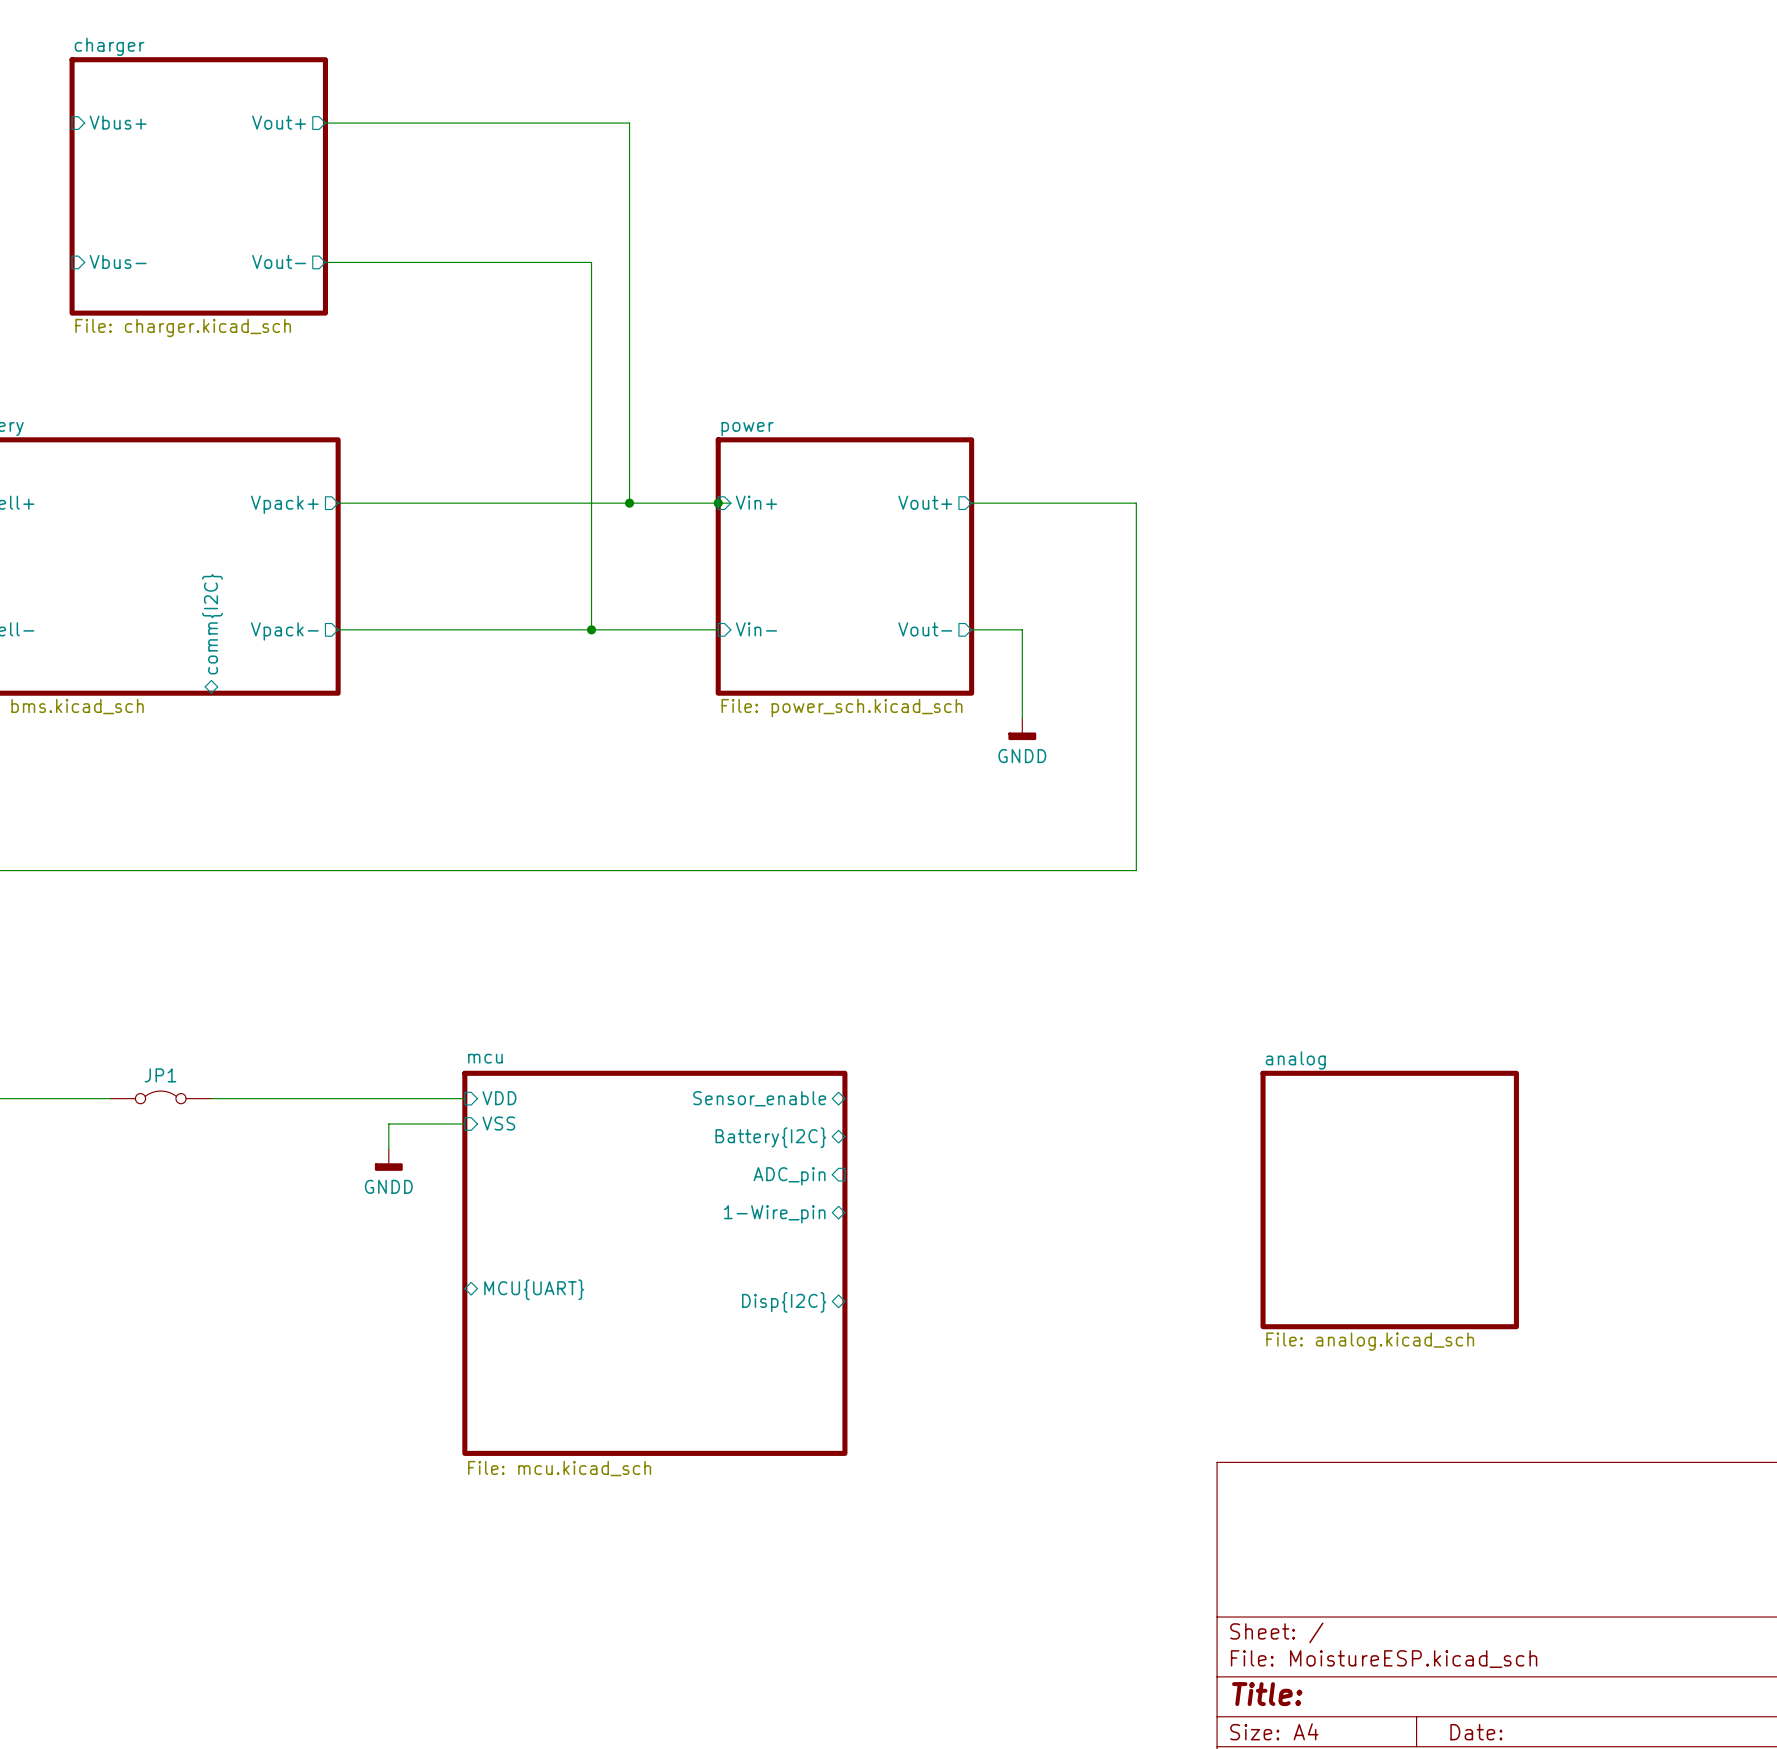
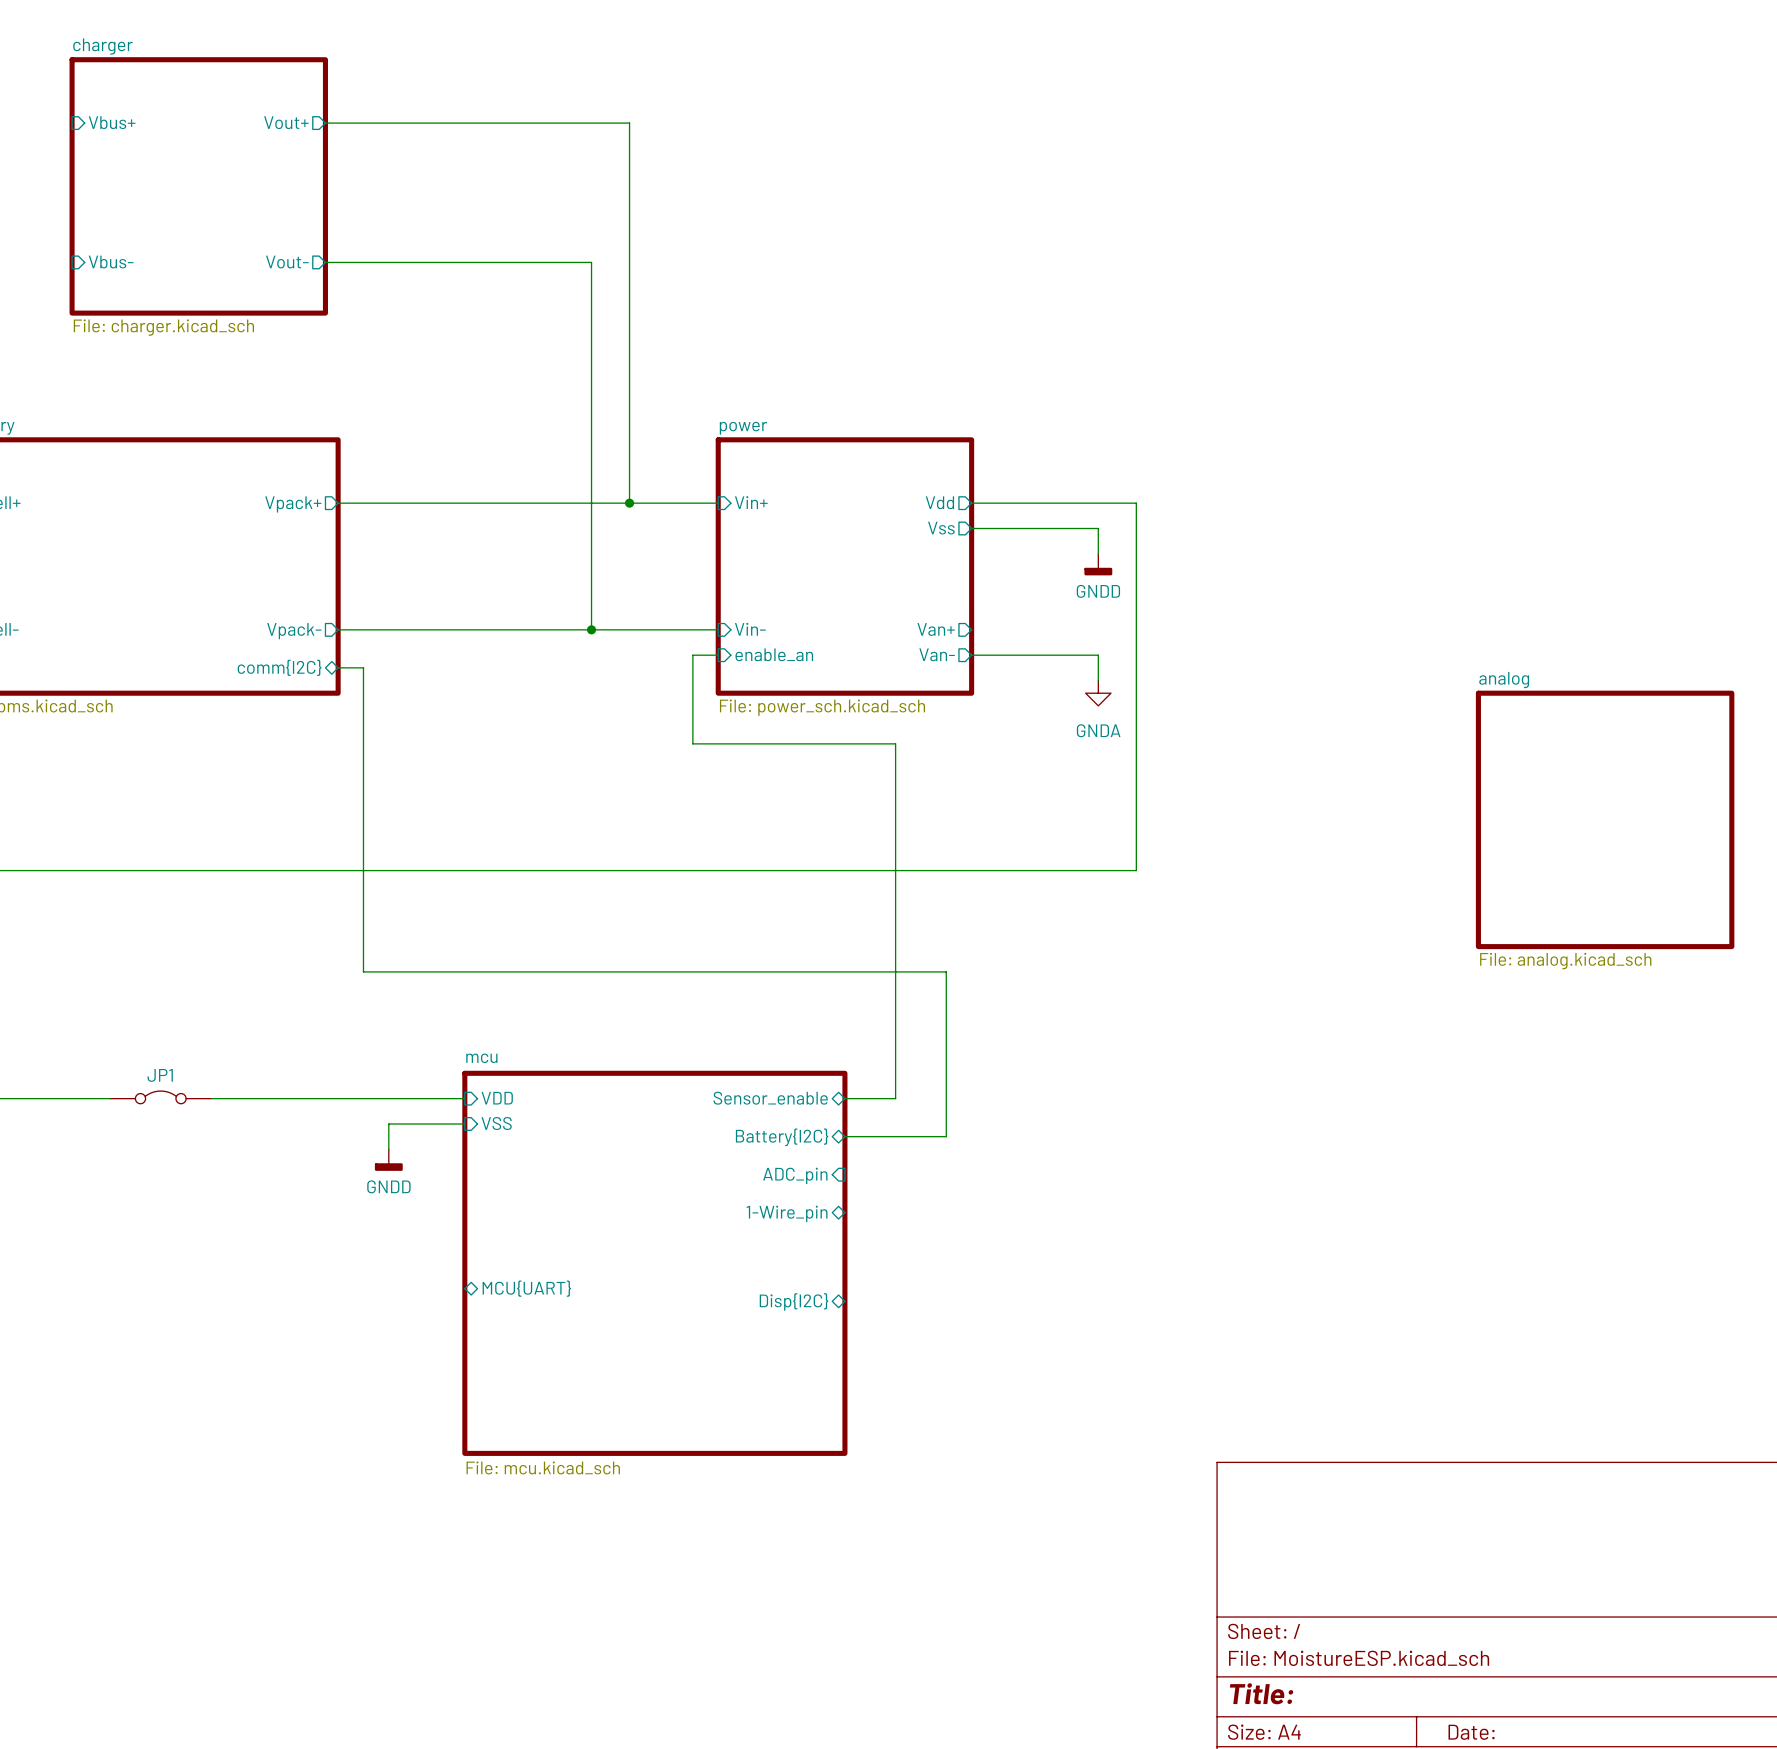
sheet pin: Vout+ (925, 502) -> Vdd (939, 502)
wire: (718, 503) (730, 503) -> none
junction: (718, 503) -> none
sheet pin: none -> Vss (941, 528)
wire: none -> (971, 528) (1098, 528) (1098, 553)
sheet pin rotation: 0° (212, 624) -> 90° counterclockwise (279, 667)
sheet pin: Vout- (925, 629) -> Van+ (936, 629)
wire: (971, 629) (1022, 629) (1022, 718) -> none
sheet pin: none -> Van- (937, 654)
wire: none -> (718, 655) (692, 655) (692, 743) (895, 743) (895, 1098) (844, 1098)
sheet pin: none -> enable_an (774, 654)
wire: none -> (971, 655) (1098, 655) (1098, 680)
wire: none -> (338, 667) (363, 667) (363, 971) (946, 971) (946, 1136) (844, 1136)
power symbol: none -> GNDA (1098, 693)
power symbol position: GNDD (1022, 729) -> GNDD (1098, 564)
sheet analog: none -> File: analog.kicad_sch (1605, 819)
sheet analog: File: analog.kicad_sch (1389, 1200) -> none

